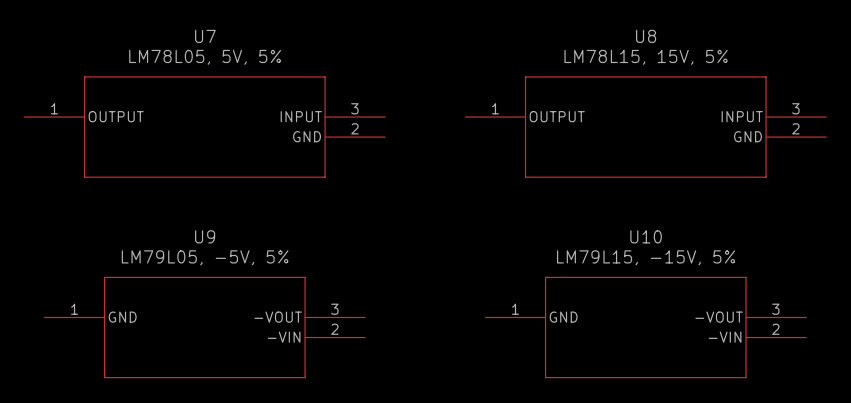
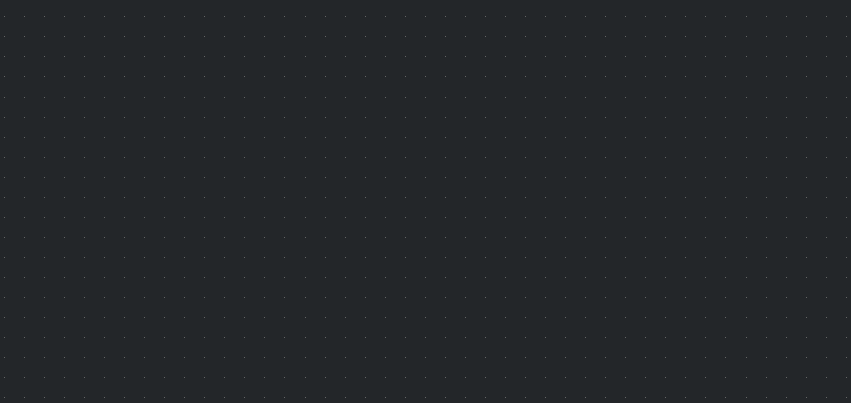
U7: LM78L05, 5V, 5% (204, 127) -> none
U8: LM78L15, 15V, 5% (645, 127) -> none
U9: LM79L05, -5V, 5% (204, 327) -> none
U10: LM79L15, -15V, 5% (645, 327) -> none

